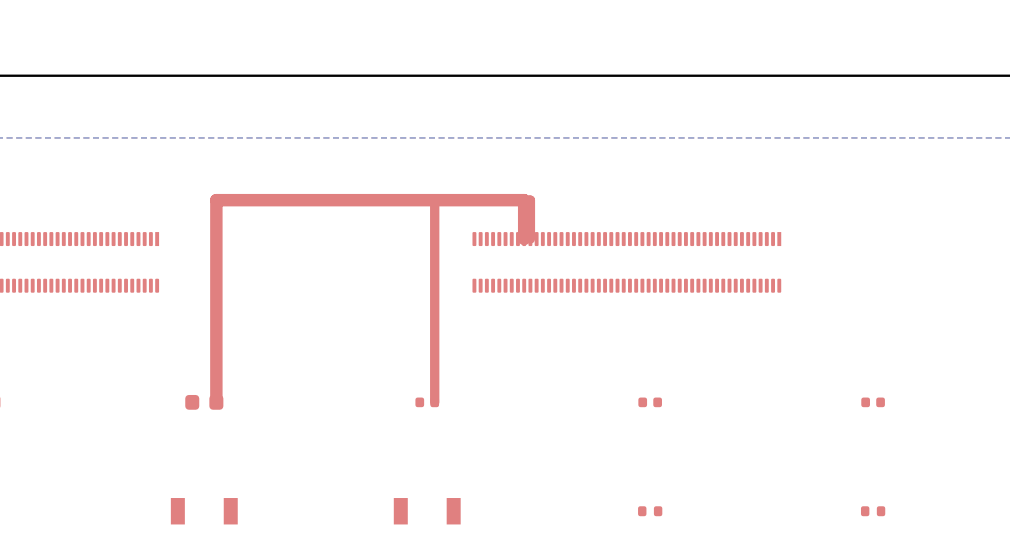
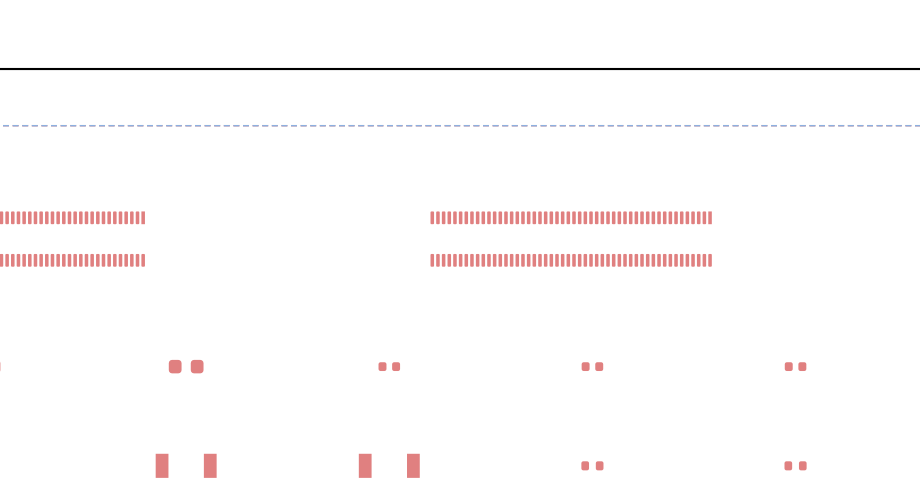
top track: (524, 239) (524, 200) (216, 200) (216, 402) -> none
top track: (530, 239) (530, 200) (434, 200) (434, 402) -> none

